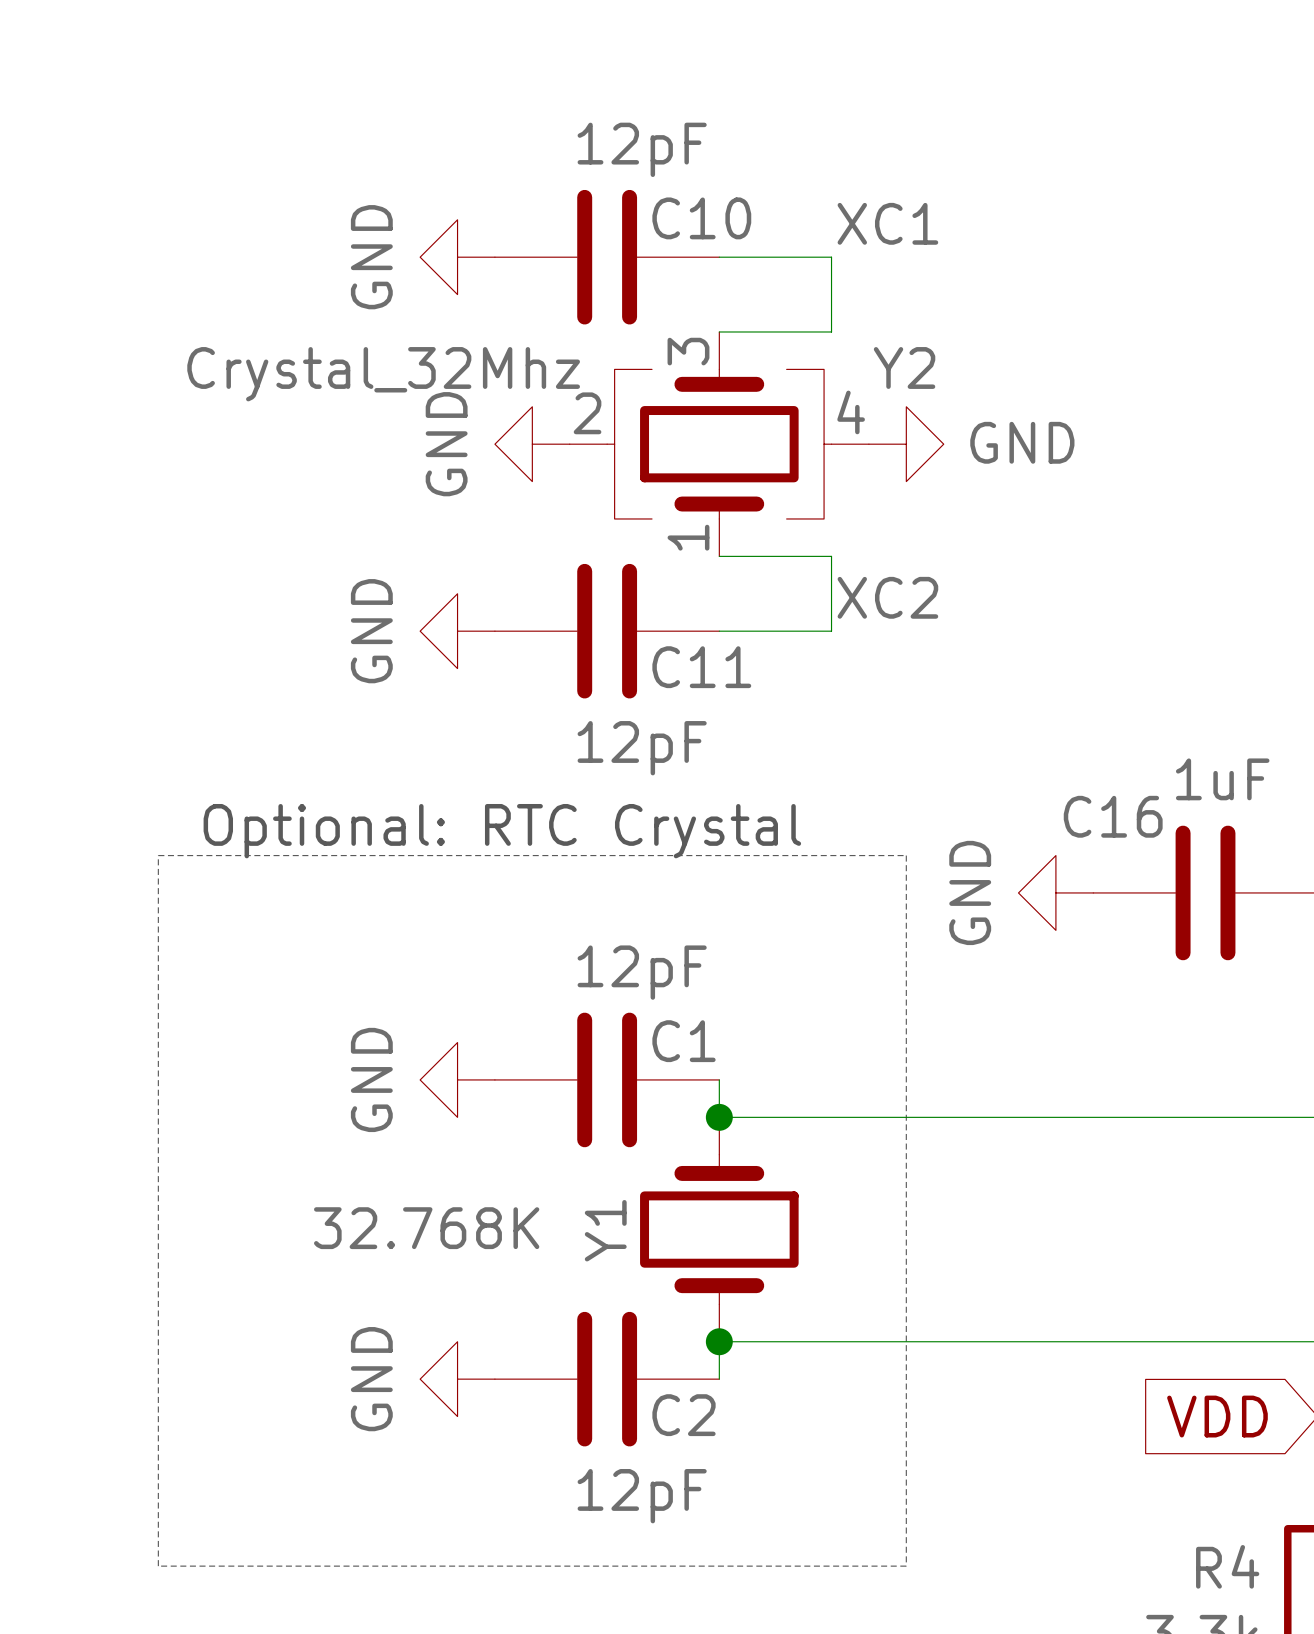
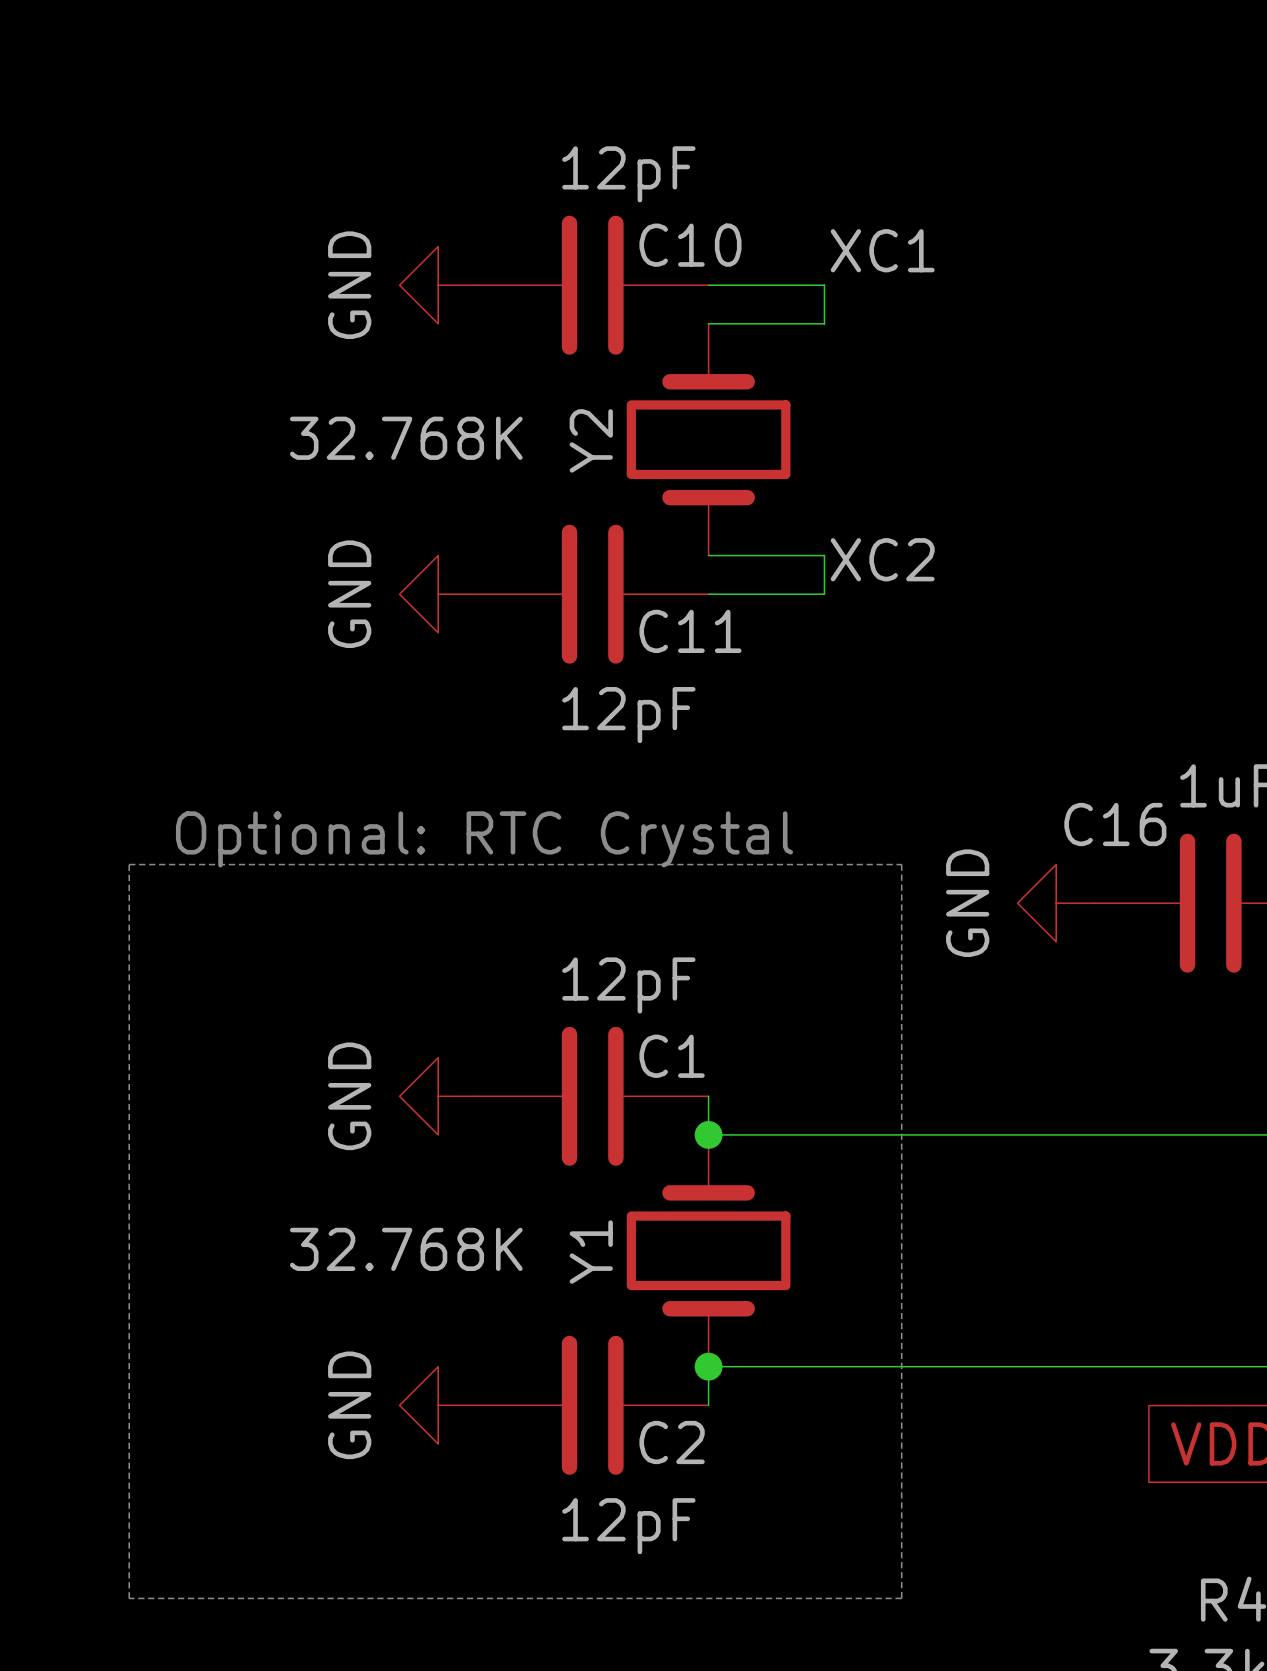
label position: XC1 (887, 223) -> XC1 (882, 250)
power symbol position: GND (457, 257) -> GND (438, 285)
C10 position: (607, 257) -> (592, 285)
wire: (719, 257) (831, 257) (831, 294) -> (708, 285) (824, 285)
Y2 symbol: [569, 331, 869, 557] -> [626, 323, 791, 556]
Y2 name position: Y2 (904, 367) -> Y2 (591, 440)
Y2 value: Crystal_32Mhz (383, 374) -> 32.768K (406, 438)
power symbol: GND (532, 444) -> none
power symbol: GND (906, 444) -> none
wire: (831, 593) (831, 631) (719, 631) -> (824, 594) (708, 594)
label position: XC2 (887, 597) -> XC2 (882, 559)
power symbol position: GND (457, 631) -> GND (438, 594)
C11 position: (607, 631) -> (592, 594)

